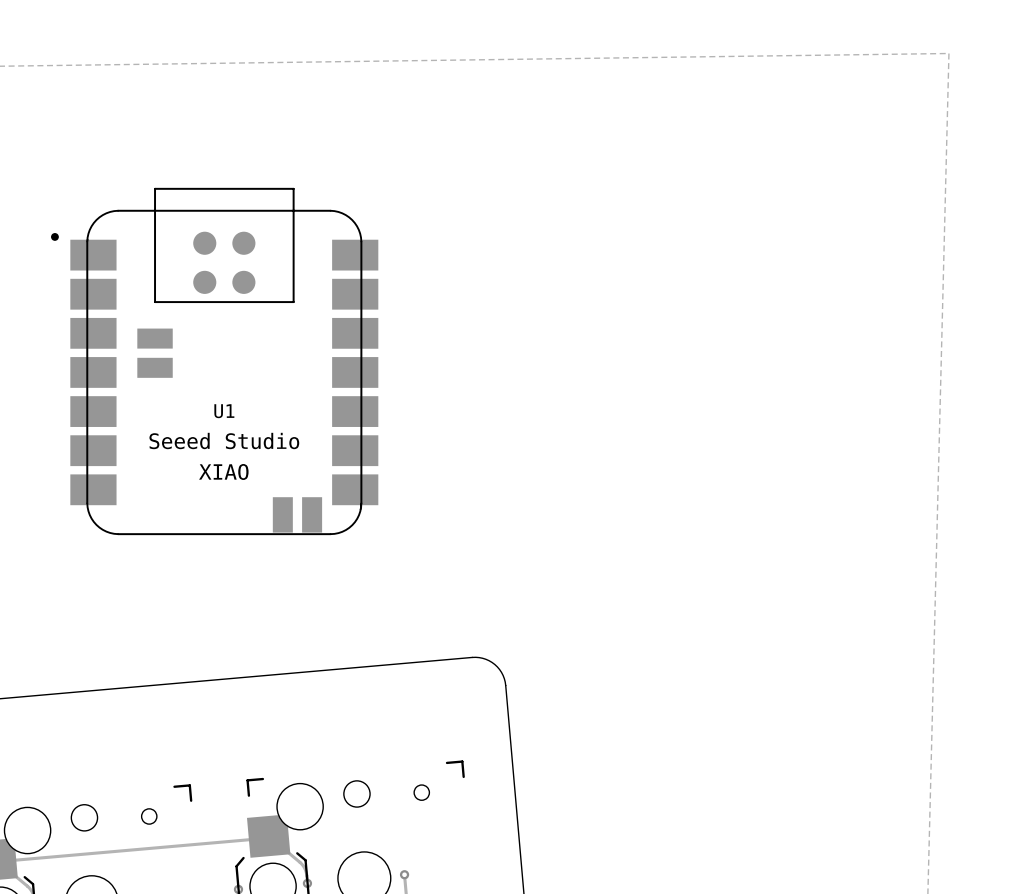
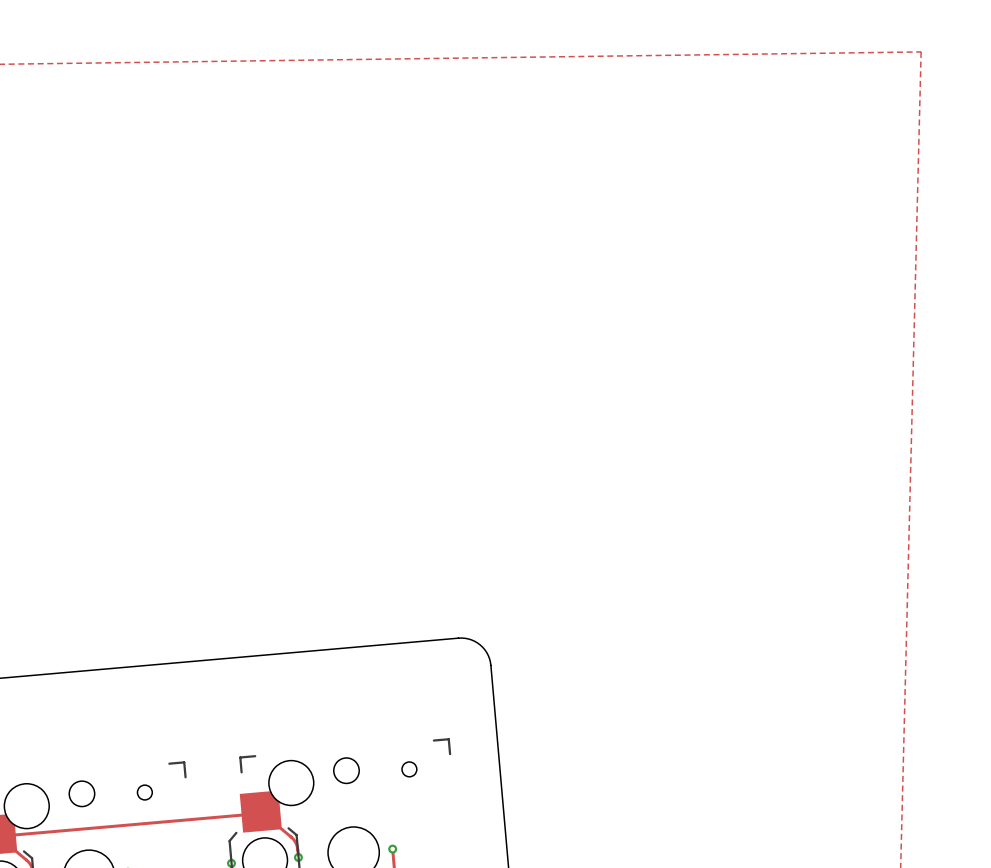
U1: (214, 361) -> none

